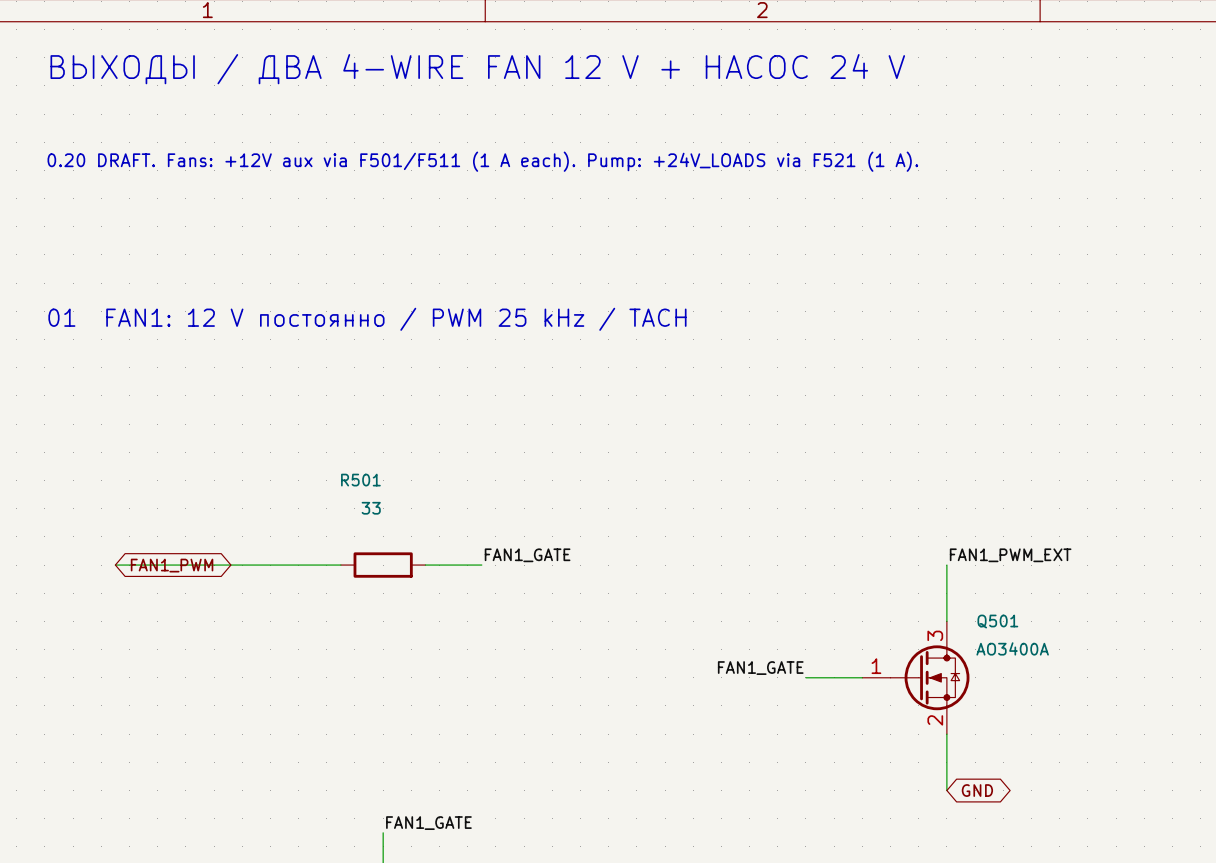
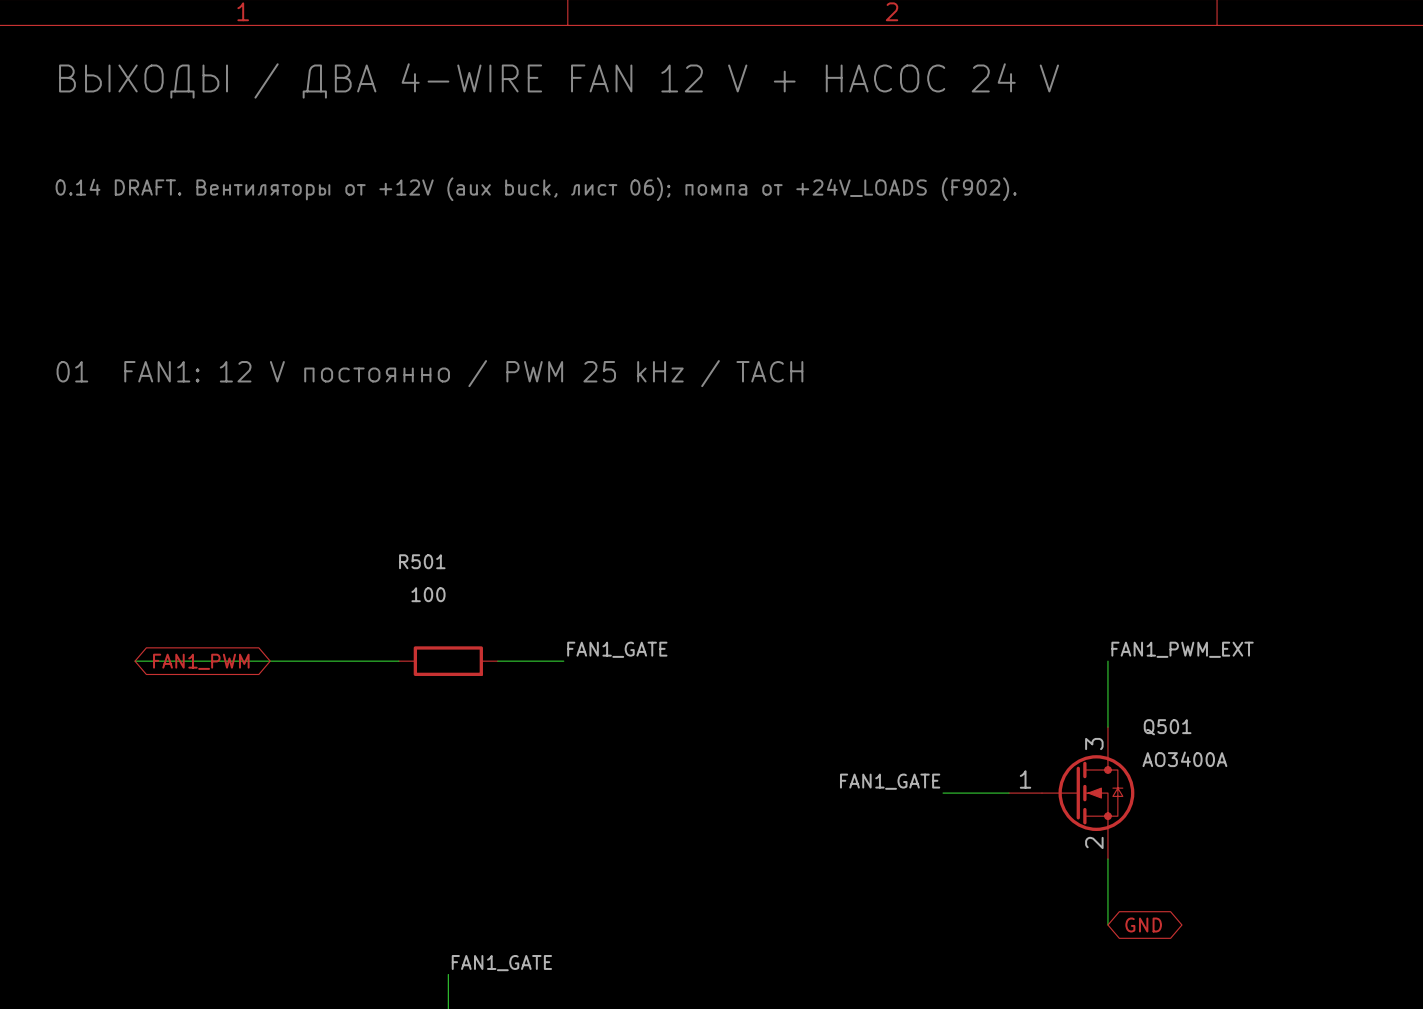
text: 0.20 DRAFT. Fans: +12V aux via F501/F511 (1 A each). Pump: +24V_LOADS via F521 (1 A). (482, 161) -> 0.14 DRAFT. Вентиляторы от +12V (aux buck, лист 06); помпа от +24V_LOADS (F902). (536, 189)
R501 value: 33 (371, 508) -> 100 (428, 594)

